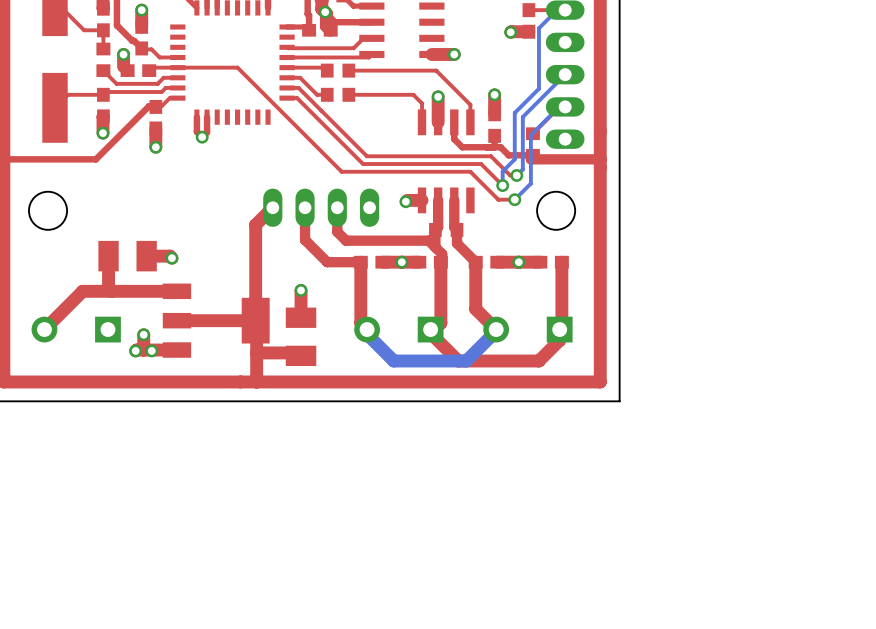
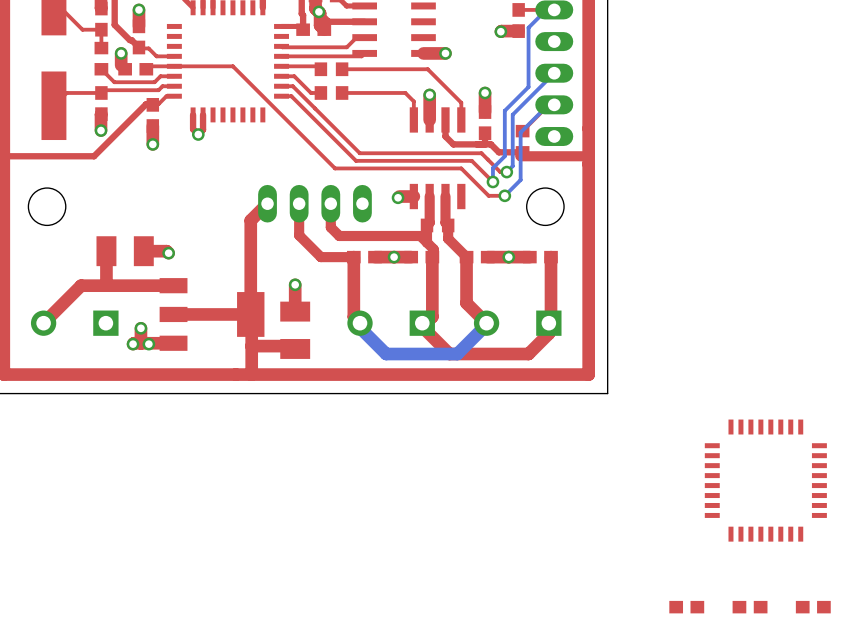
part: none -> (765, 480)
part: none -> (686, 607)
part: none -> (750, 607)
part: none -> (813, 607)

